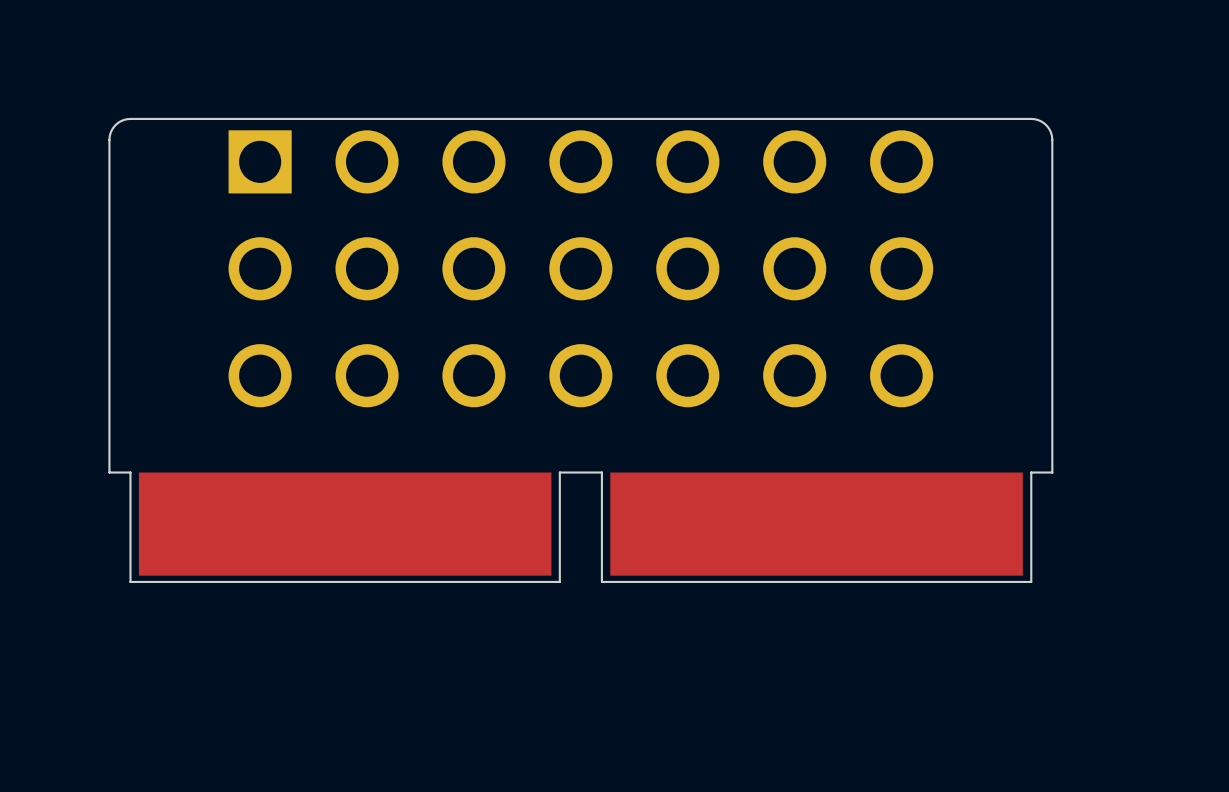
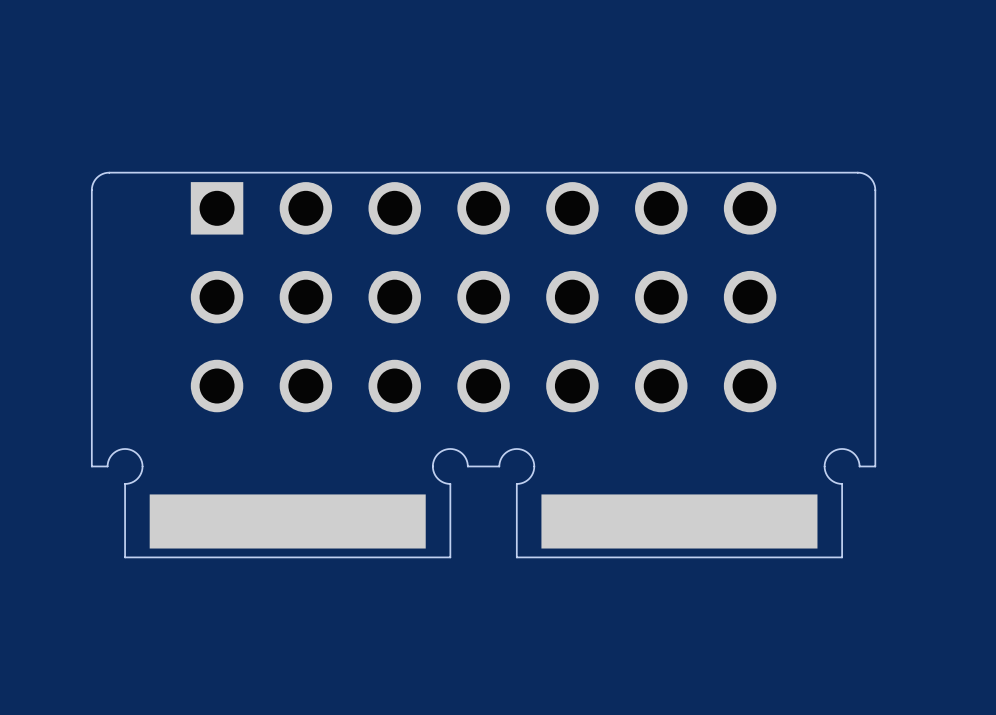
board edge: (128, 472) (130, 472) (130, 581) (149, 581) -> (107, 466) (112, 454) (122, 449) (135, 452) (142, 464) (138, 477) (131, 482) (125, 483) (125, 557)
part footprint: [138, 472, 552, 576] -> [149, 494, 426, 549]
board edge: (561, 472) (559, 472) (559, 581) (540, 581) -> (467, 466) (463, 454) (452, 449) (440, 452) (433, 462) (433, 470) (436, 477) (443, 482) (450, 483) (450, 557)
board edge: (599, 472) (601, 472) (601, 581) (620, 581) -> (499, 466) (504, 454) (514, 449) (527, 452) (534, 464) (530, 477) (523, 482) (516, 483) (516, 557)
part footprint: [610, 472, 1023, 576] -> [541, 494, 818, 549]
board edge: (1033, 472) (1031, 472) (1031, 581) (1012, 581) -> (859, 466) (855, 454) (844, 449) (832, 452) (825, 462) (825, 470) (828, 477) (835, 482) (842, 483) (842, 557)

